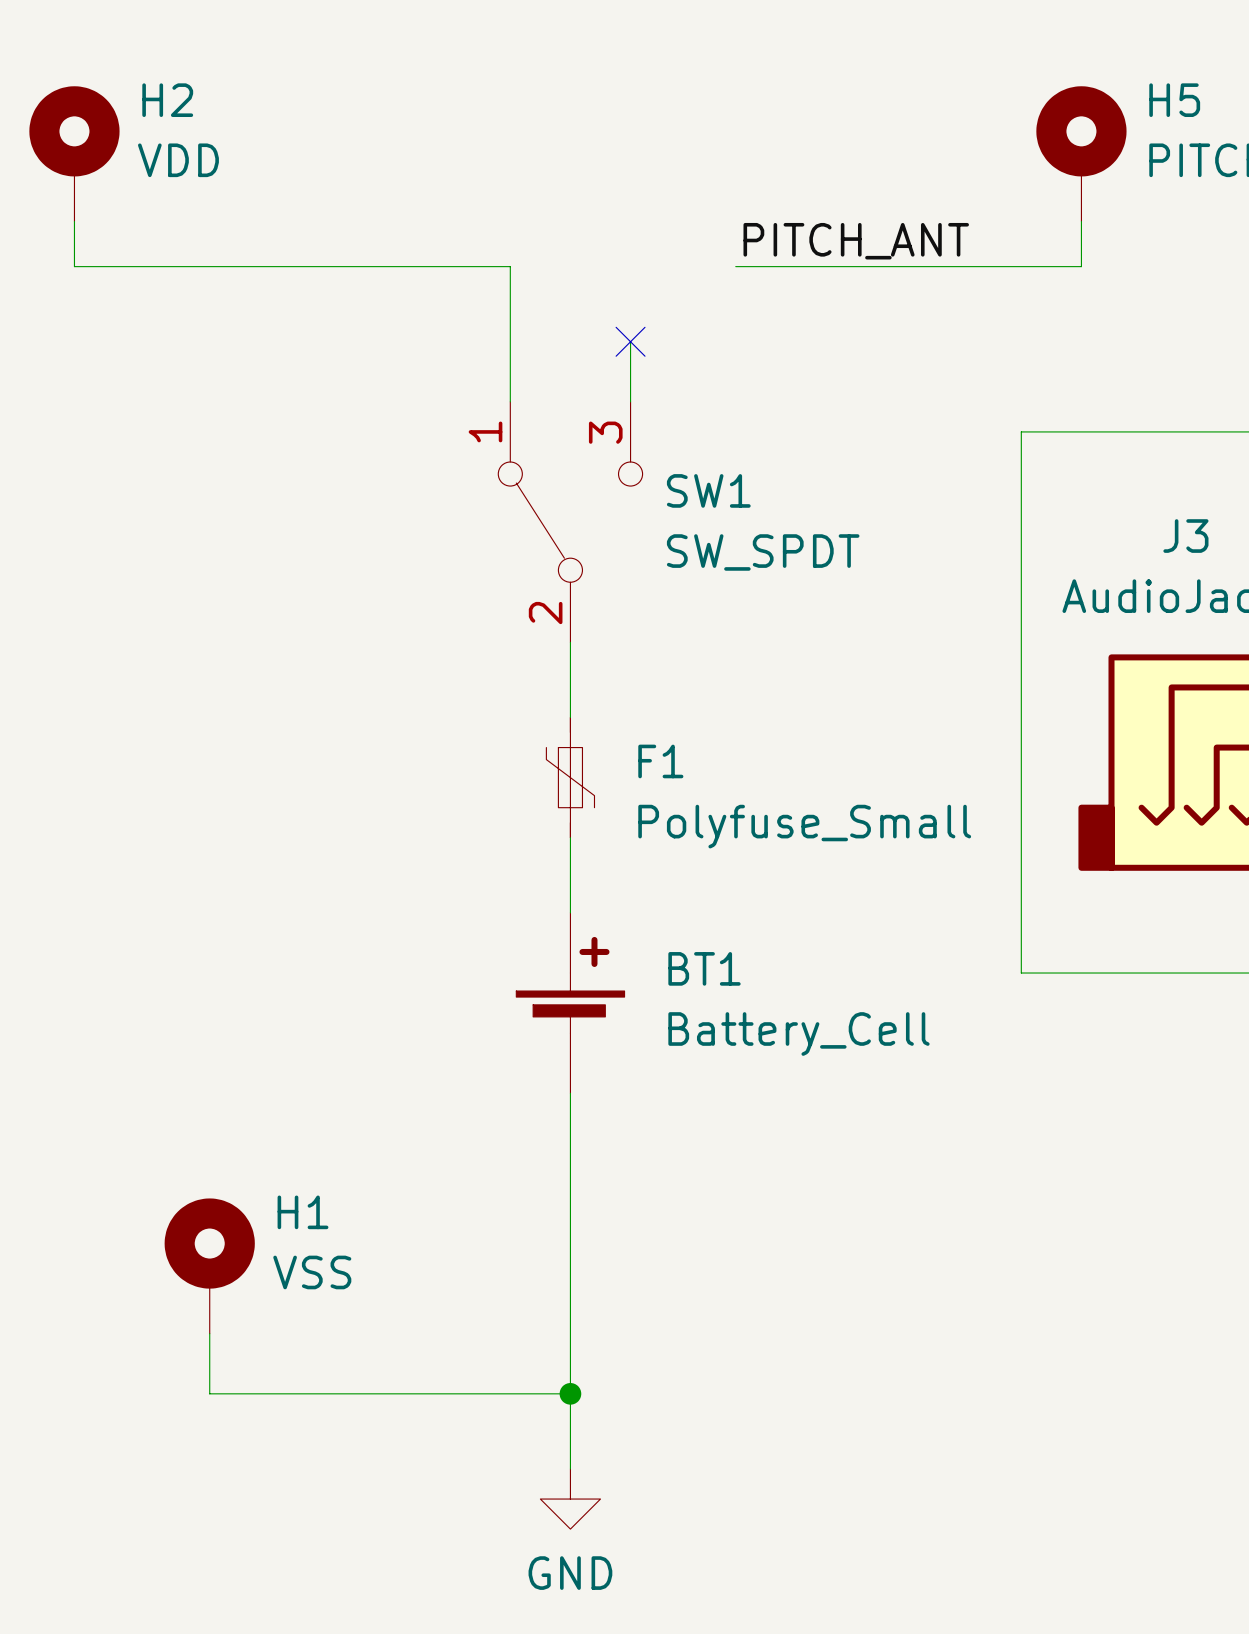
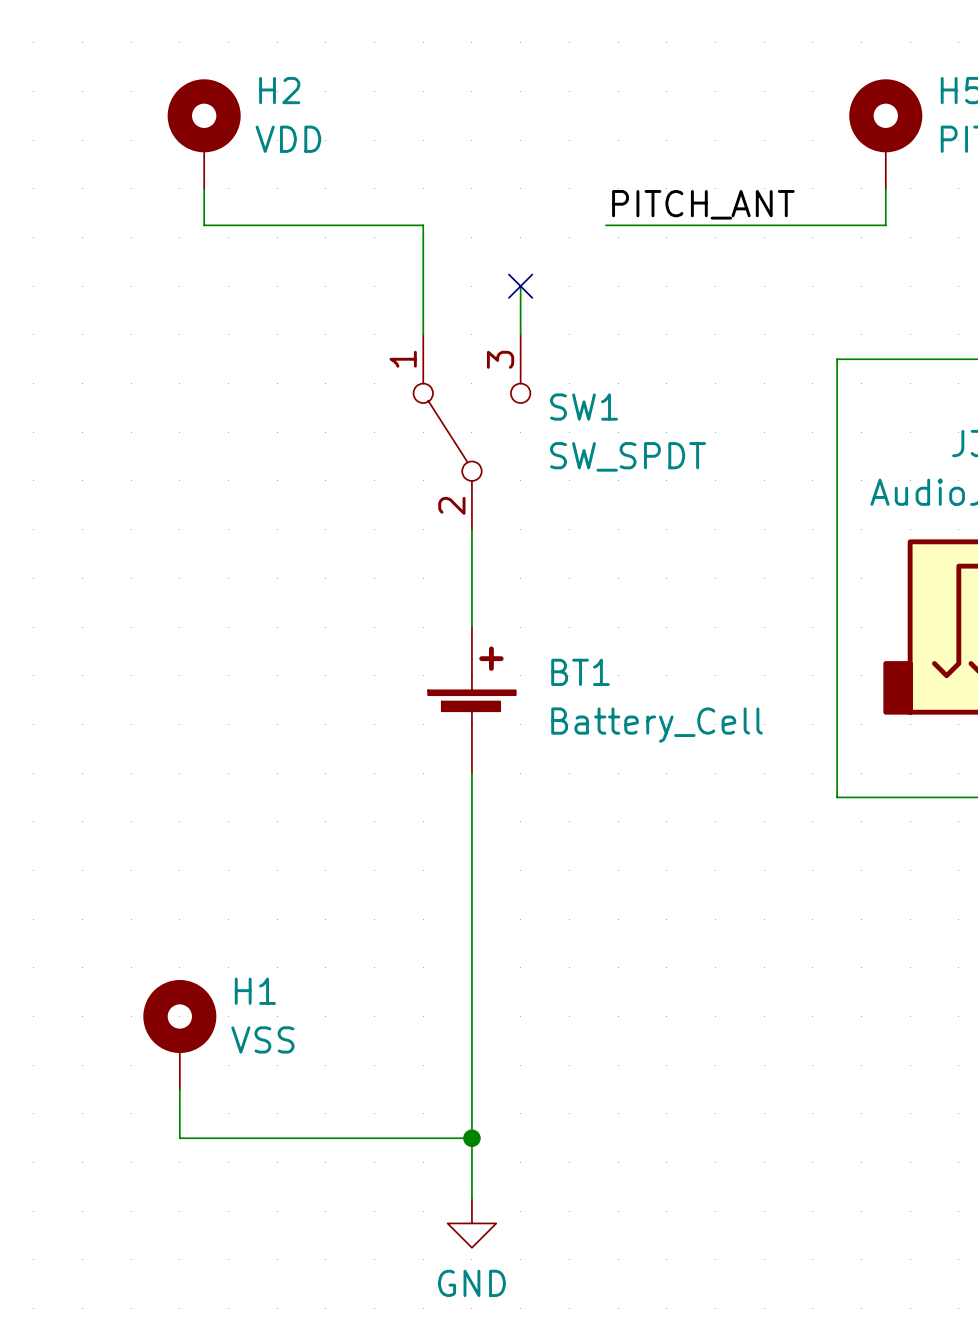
H2 position: (74, 153) -> (204, 134)
wire: (74, 221) (74, 266) (239, 266) -> (204, 188) (204, 225)
F1: Polyfuse_Small (570, 777) -> none
BT1 position: (570, 1003) -> (471, 700)

